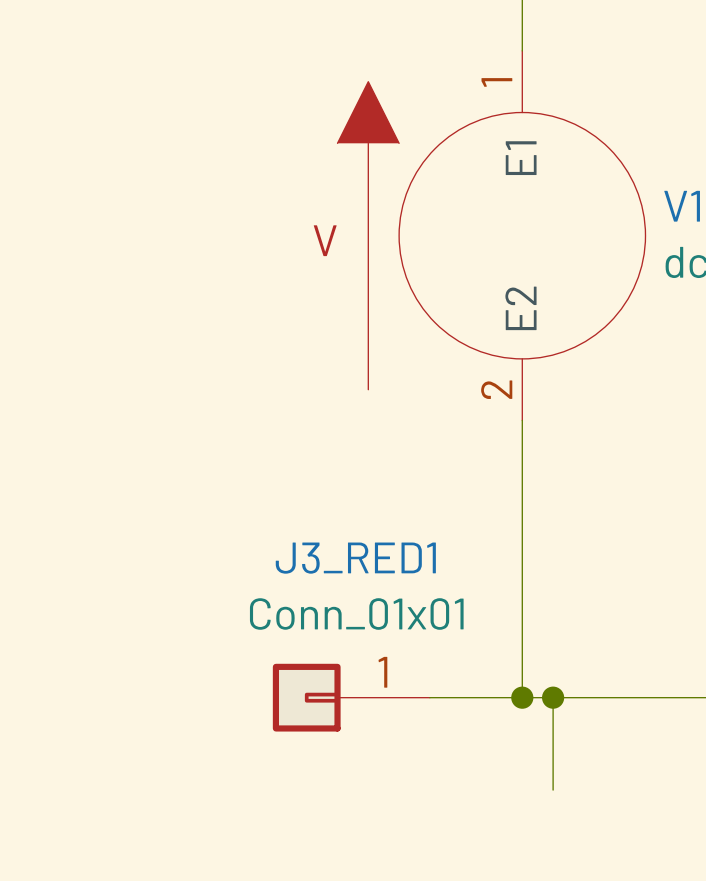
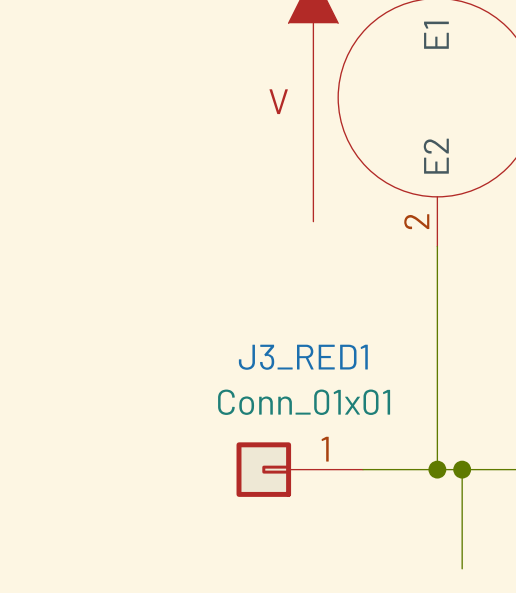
wire: none -> (462, 544) (462, 568)

